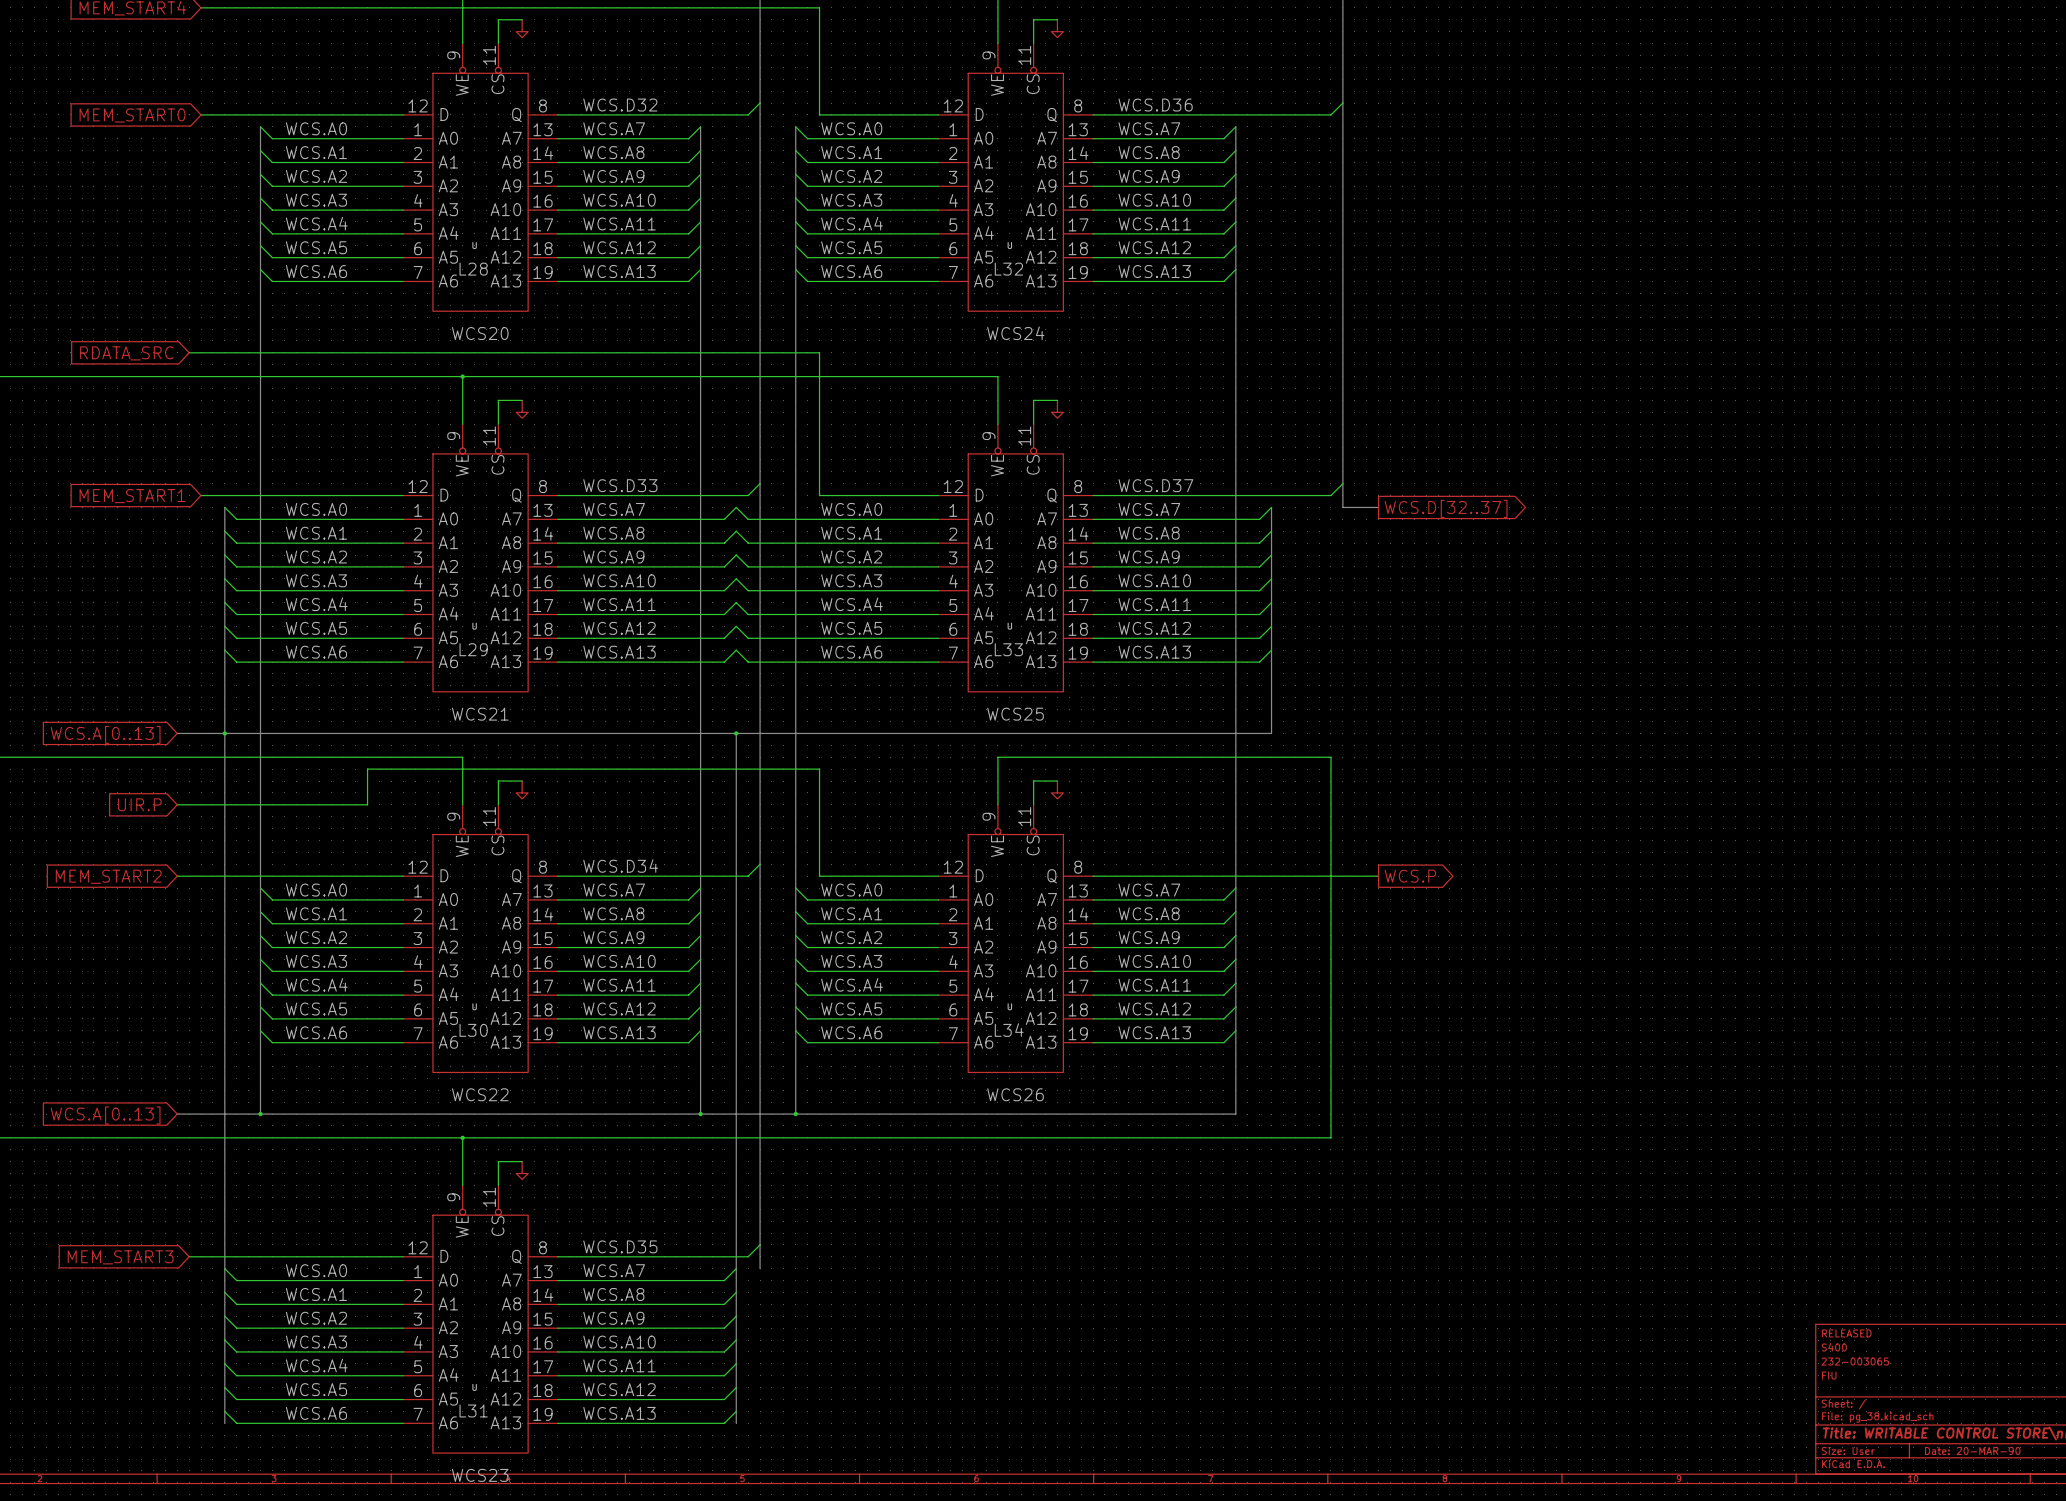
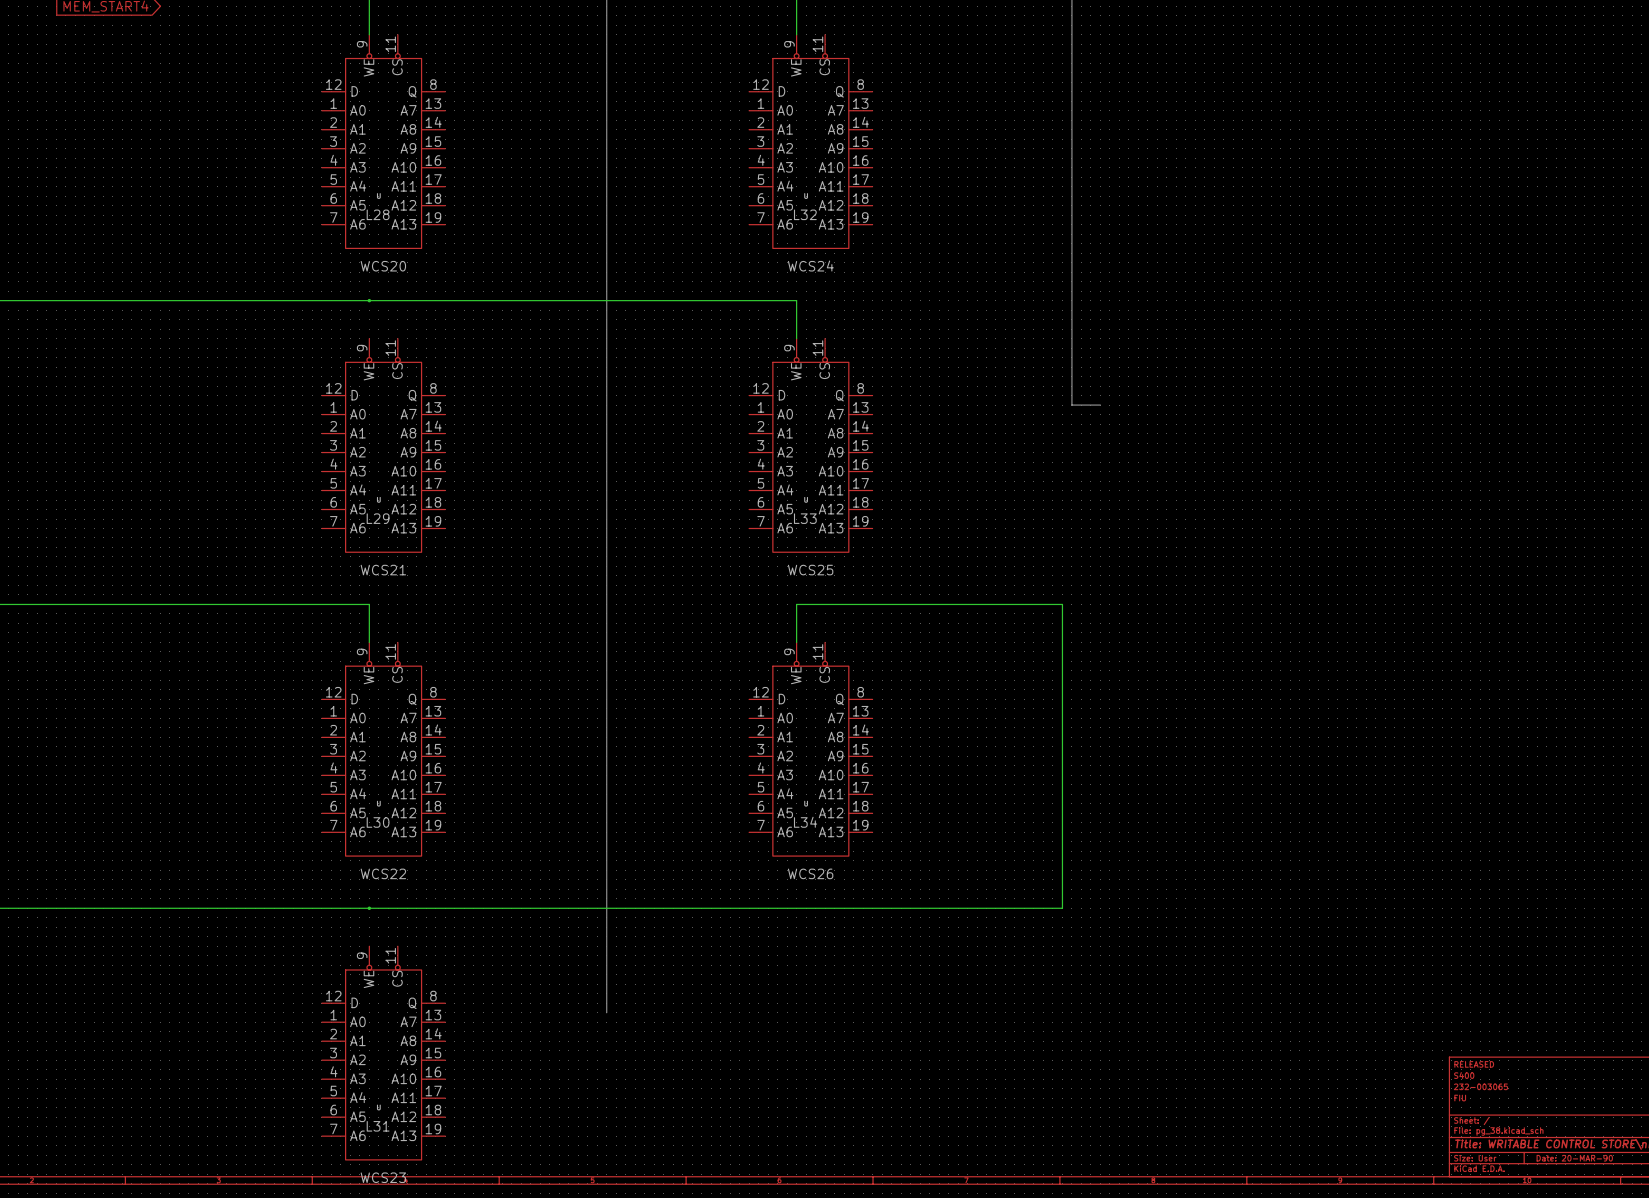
wire: (201, 7) (819, 7) (819, 114) (938, 114) -> none
wire: (522, 19) (498, 19) (498, 43) -> none
wire: (1057, 19) (1033, 19) (1033, 43) -> none
power symbol: (522, 28) -> none
power symbol: (1057, 28) -> none
wire: (760, 103) (748, 114) (557, 114) -> none
wire: (1342, 103) (1330, 114) (1093, 114) -> none
label: WCS.D32 (620, 105) -> none
label: WCS.D36 (1155, 105) -> none
wire: (201, 114) (403, 114) -> none
global label: MEM_START0 (132, 115) -> none
wire: (260, 126) (272, 138) (403, 138) -> none
bus: (260, 126) (260, 1114) -> none
wire: (700, 126) (688, 138) (557, 138) -> none
bus: (700, 126) (700, 1114) -> none
wire: (795, 126) (807, 138) (938, 138) -> none
bus: (795, 126) (795, 1114) -> none
wire: (1235, 126) (1223, 138) (1093, 138) -> none
bus: (1235, 126) (1235, 1114) (177, 1114) -> none
label: WCS.A0 (316, 128) -> none
label: WCS.A7 (614, 128) -> none
label: WCS.A0 (851, 128) -> none
label: WCS.A7 (1149, 128) -> none
wire: (260, 150) (272, 162) (403, 162) -> none
wire: (700, 150) (688, 162) (557, 162) -> none
wire: (795, 150) (807, 162) (938, 162) -> none
wire: (1235, 150) (1223, 162) (1093, 162) -> none
label: WCS.A1 (316, 152) -> none
label: WCS.A8 (613, 152) -> none
label: WCS.A1 (851, 152) -> none
label: WCS.A8 (1149, 152) -> none
wire: (260, 174) (272, 186) (403, 186) -> none
wire: (700, 174) (688, 186) (557, 186) -> none
wire: (795, 174) (807, 186) (938, 186) -> none
wire: (1235, 174) (1223, 186) (1093, 186) -> none
label: WCS.A2 (316, 176) -> none
label: WCS.A9 (613, 176) -> none
label: WCS.A2 (851, 176) -> none
label: WCS.A9 (1149, 176) -> none
wire: (260, 198) (272, 210) (403, 210) -> none
wire: (700, 198) (688, 210) (557, 210) -> none
wire: (795, 198) (807, 210) (938, 210) -> none
wire: (1235, 198) (1223, 210) (1093, 210) -> none
label: WCS.A3 (316, 200) -> none
label: WCS.A10 (619, 200) -> none
label: WCS.A3 (851, 200) -> none
label: WCS.A10 (1154, 200) -> none
wire: (260, 221) (272, 233) (403, 233) -> none
wire: (700, 221) (688, 233) (557, 233) -> none
wire: (795, 221) (807, 233) (938, 233) -> none
wire: (1235, 221) (1223, 233) (1093, 233) -> none
label: WCS.A4 (316, 223) -> none
label: WCS.A11 (619, 223) -> none
label: WCS.A4 (852, 223) -> none
label: WCS.A11 (1154, 223) -> none
wire: (260, 245) (272, 257) (403, 257) -> none
wire: (700, 245) (688, 257) (557, 257) -> none
wire: (795, 245) (807, 257) (938, 257) -> none
wire: (1235, 245) (1223, 257) (1093, 257) -> none
label: WCS.A5 (316, 247) -> none
label: WCS.A12 (619, 247) -> none
label: WCS.A5 (851, 247) -> none
label: WCS.A12 (1154, 247) -> none
wire: (260, 269) (272, 281) (403, 281) -> none
wire: (700, 269) (688, 281) (557, 281) -> none
wire: (795, 269) (807, 281) (938, 281) -> none
wire: (1235, 269) (1223, 281) (1093, 281) -> none
label: WCS.A6 (316, 271) -> none
label: WCS.A13 (619, 271) -> none
label: WCS.A6 (851, 271) -> none
label: WCS.A13 (1154, 271) -> none
wire: (189, 352) (819, 352) (819, 495) (938, 495) -> none
global label: RDATA_SRC (126, 353) -> none
wire: (462, 376) (462, 424) -> none
wire: (522, 400) (498, 400) (498, 424) -> none
wire: (1057, 400) (1033, 400) (1033, 424) -> none
power symbol: (522, 409) -> none
power symbol: (1057, 409) -> none
wire: (760, 483) (748, 495) (557, 495) -> none
wire: (1342, 483) (1330, 495) (1093, 495) -> none
label: WCS.D33 (620, 485) -> none
label: WCS.D37 (1155, 485) -> none
wire: (201, 495) (403, 495) -> none
global label: MEM_START1 (132, 496) -> none
wire: (224, 507) (236, 519) (403, 519) -> none
bus: (224, 507) (224, 1423) -> none
wire: (1271, 507) (1259, 519) (1093, 519) -> none
bus: (1271, 507) (1271, 733) (177, 733) -> none
global label: WCS.D[32..37] (1446, 508) -> none
label: WCS.A0 (316, 509) -> none
label: WCS.A7 (614, 509) -> none
label: WCS.A0 (851, 509) -> none
label: WCS.A7 (1149, 509) -> none
wire: (557, 519) (724, 519) (736, 507) (748, 519) (938, 519) -> none
wire: (224, 531) (236, 543) (403, 543) -> none
wire: (1271, 531) (1259, 543) (1093, 543) -> none
label: WCS.A1 (316, 533) -> none
label: WCS.A8 (613, 533) -> none
label: WCS.A1 (851, 533) -> none
label: WCS.A8 (1149, 533) -> none
wire: (557, 543) (724, 543) (736, 531) (748, 543) (938, 543) -> none
wire: (224, 555) (236, 566) (403, 566) -> none
wire: (1271, 555) (1259, 566) (1093, 566) -> none
label: WCS.A2 (316, 557) -> none
label: WCS.A9 (613, 557) -> none
label: WCS.A2 (851, 557) -> none
label: WCS.A9 (1149, 557) -> none
wire: (557, 566) (724, 566) (736, 555) (748, 566) (938, 566) -> none
wire: (224, 578) (236, 590) (403, 590) -> none
wire: (1271, 578) (1259, 590) (1093, 590) -> none
label: WCS.A3 (316, 580) -> none
label: WCS.A10 (619, 580) -> none
label: WCS.A3 (851, 580) -> none
label: WCS.A10 (1154, 580) -> none
wire: (557, 590) (724, 590) (736, 578) (748, 590) (938, 590) -> none
wire: (224, 602) (236, 614) (403, 614) -> none
wire: (1271, 602) (1259, 614) (1093, 614) -> none
label: WCS.A4 (316, 604) -> none
label: WCS.A11 (619, 604) -> none
label: WCS.A4 (852, 604) -> none
label: WCS.A11 (1154, 604) -> none
wire: (557, 614) (724, 614) (736, 602) (748, 614) (938, 614) -> none
wire: (224, 626) (236, 638) (403, 638) -> none
wire: (1271, 626) (1259, 638) (1093, 638) -> none
label: WCS.A5 (316, 628) -> none
label: WCS.A12 (619, 628) -> none
label: WCS.A5 (851, 628) -> none
label: WCS.A12 (1154, 628) -> none
wire: (557, 638) (724, 638) (736, 626) (748, 638) (938, 638) -> none
wire: (224, 650) (236, 662) (403, 662) -> none
wire: (1271, 650) (1259, 662) (1093, 662) -> none
label: WCS.A6 (316, 652) -> none
label: WCS.A13 (619, 652) -> none
label: WCS.A6 (851, 652) -> none
label: WCS.A13 (1154, 652) -> none
wire: (557, 662) (724, 662) (736, 650) (748, 662) (938, 662) -> none
junction: (224, 733) -> none
bus: (736, 733) (736, 1423) -> none
junction: (736, 733) -> none
global label: WCS.A[0..13] (105, 734) -> none
wire: (522, 781) (498, 781) (498, 804) -> none
wire: (1057, 781) (1033, 781) (1033, 804) -> none
power symbol: (522, 790) -> none
power symbol: (1057, 790) -> none
global label: UIR.P (139, 804) -> none
wire: (177, 804) (367, 804) (367, 769) (819, 769) (819, 876) (938, 876) -> none
wire: (760, 864) (748, 876) (557, 876) -> none
label: WCS.D34 (620, 865) -> none
global label: MEM_START2 (108, 876) -> none
wire: (177, 876) (403, 876) -> none
wire: (1093, 876) (1378, 876) -> none
global label: WCS.P (1410, 876) -> none
wire: (260, 888) (272, 899) (403, 899) -> none
wire: (700, 888) (688, 899) (557, 899) -> none
wire: (795, 888) (807, 899) (938, 899) -> none
wire: (1235, 888) (1223, 899) (1093, 899) -> none
label: WCS.A0 (316, 890) -> none
label: WCS.A7 (614, 890) -> none
label: WCS.A0 (851, 890) -> none
label: WCS.A7 (1149, 890) -> none
wire: (260, 911) (272, 923) (403, 923) -> none
wire: (700, 911) (688, 923) (557, 923) -> none
wire: (795, 911) (807, 923) (938, 923) -> none
wire: (1235, 911) (1223, 923) (1093, 923) -> none
label: WCS.A1 (316, 913) -> none
label: WCS.A8 (613, 913) -> none
label: WCS.A1 (851, 913) -> none
label: WCS.A8 (1149, 913) -> none
wire: (260, 935) (272, 947) (403, 947) -> none
wire: (700, 935) (688, 947) (557, 947) -> none
wire: (795, 935) (807, 947) (938, 947) -> none
wire: (1235, 935) (1223, 947) (1093, 947) -> none
label: WCS.A2 (316, 937) -> none
label: WCS.A9 (613, 937) -> none
label: WCS.A2 (851, 937) -> none
label: WCS.A9 (1149, 937) -> none
wire: (260, 959) (272, 971) (403, 971) -> none
wire: (700, 959) (688, 971) (557, 971) -> none
wire: (795, 959) (807, 971) (938, 971) -> none
wire: (1235, 959) (1223, 971) (1093, 971) -> none
label: WCS.A3 (316, 961) -> none
label: WCS.A10 (619, 961) -> none
label: WCS.A3 (851, 961) -> none
label: WCS.A10 (1154, 961) -> none
wire: (260, 983) (272, 995) (403, 995) -> none
wire: (700, 983) (688, 995) (557, 995) -> none
wire: (795, 983) (807, 995) (938, 995) -> none
wire: (1235, 983) (1223, 995) (1093, 995) -> none
label: WCS.A4 (316, 984) -> none
label: WCS.A4 (852, 984) -> none
label: WCS.A11 (619, 985) -> none
label: WCS.A11 (1154, 985) -> none
wire: (260, 1007) (272, 1018) (403, 1018) -> none
wire: (700, 1007) (688, 1018) (557, 1018) -> none
wire: (795, 1007) (807, 1018) (938, 1018) -> none
wire: (1235, 1007) (1223, 1018) (1093, 1018) -> none
label: WCS.A5 (316, 1009) -> none
label: WCS.A12 (619, 1009) -> none
label: WCS.A5 (851, 1009) -> none
label: WCS.A12 (1154, 1009) -> none
wire: (260, 1030) (272, 1042) (403, 1042) -> none
wire: (700, 1030) (688, 1042) (557, 1042) -> none
wire: (795, 1030) (807, 1042) (938, 1042) -> none
wire: (1235, 1030) (1223, 1042) (1093, 1042) -> none
label: WCS.A6 (316, 1032) -> none
label: WCS.A13 (619, 1032) -> none
label: WCS.A6 (851, 1032) -> none
label: WCS.A13 (1154, 1032) -> none
junction: (260, 1114) -> none
junction: (700, 1114) -> none
junction: (795, 1114) -> none
global label: WCS.A[0..13] (105, 1115) -> none
wire: (462, 1137) (462, 1185) -> none
wire: (522, 1161) (498, 1161) (498, 1185) -> none
power symbol: (522, 1170) -> none
wire: (760, 1244) (748, 1256) (557, 1256) -> none
label: WCS.D35 (620, 1246) -> none
wire: (189, 1256) (403, 1256) -> none
global label: MEM_START3 (120, 1257) -> none
wire: (224, 1268) (236, 1280) (403, 1280) -> none
wire: (736, 1268) (724, 1280) (557, 1280) -> none
label: WCS.A0 (316, 1270) -> none
label: WCS.A7 (614, 1270) -> none
wire: (224, 1292) (236, 1304) (403, 1304) -> none
wire: (736, 1292) (724, 1304) (557, 1304) -> none
label: WCS.A1 (316, 1294) -> none
label: WCS.A8 (613, 1294) -> none
wire: (224, 1316) (236, 1328) (403, 1328) -> none
wire: (736, 1316) (724, 1328) (557, 1328) -> none
label: WCS.A2 (316, 1318) -> none
label: WCS.A9 (613, 1318) -> none
wire: (224, 1340) (236, 1351) (403, 1351) -> none
wire: (736, 1340) (724, 1351) (557, 1351) -> none
label: WCS.A3 (316, 1342) -> none
label: WCS.A10 (619, 1342) -> none
wire: (224, 1363) (236, 1375) (403, 1375) -> none
wire: (736, 1363) (724, 1375) (557, 1375) -> none
label: WCS.A4 (316, 1365) -> none
label: WCS.A11 (619, 1365) -> none
wire: (224, 1387) (236, 1399) (403, 1399) -> none
wire: (736, 1387) (724, 1399) (557, 1399) -> none
label: WCS.A5 (316, 1389) -> none
label: WCS.A12 (619, 1389) -> none
wire: (224, 1411) (236, 1423) (403, 1423) -> none
wire: (736, 1411) (724, 1423) (557, 1423) -> none
label: WCS.A6 (316, 1413) -> none
label: WCS.A13 (619, 1413) -> none

